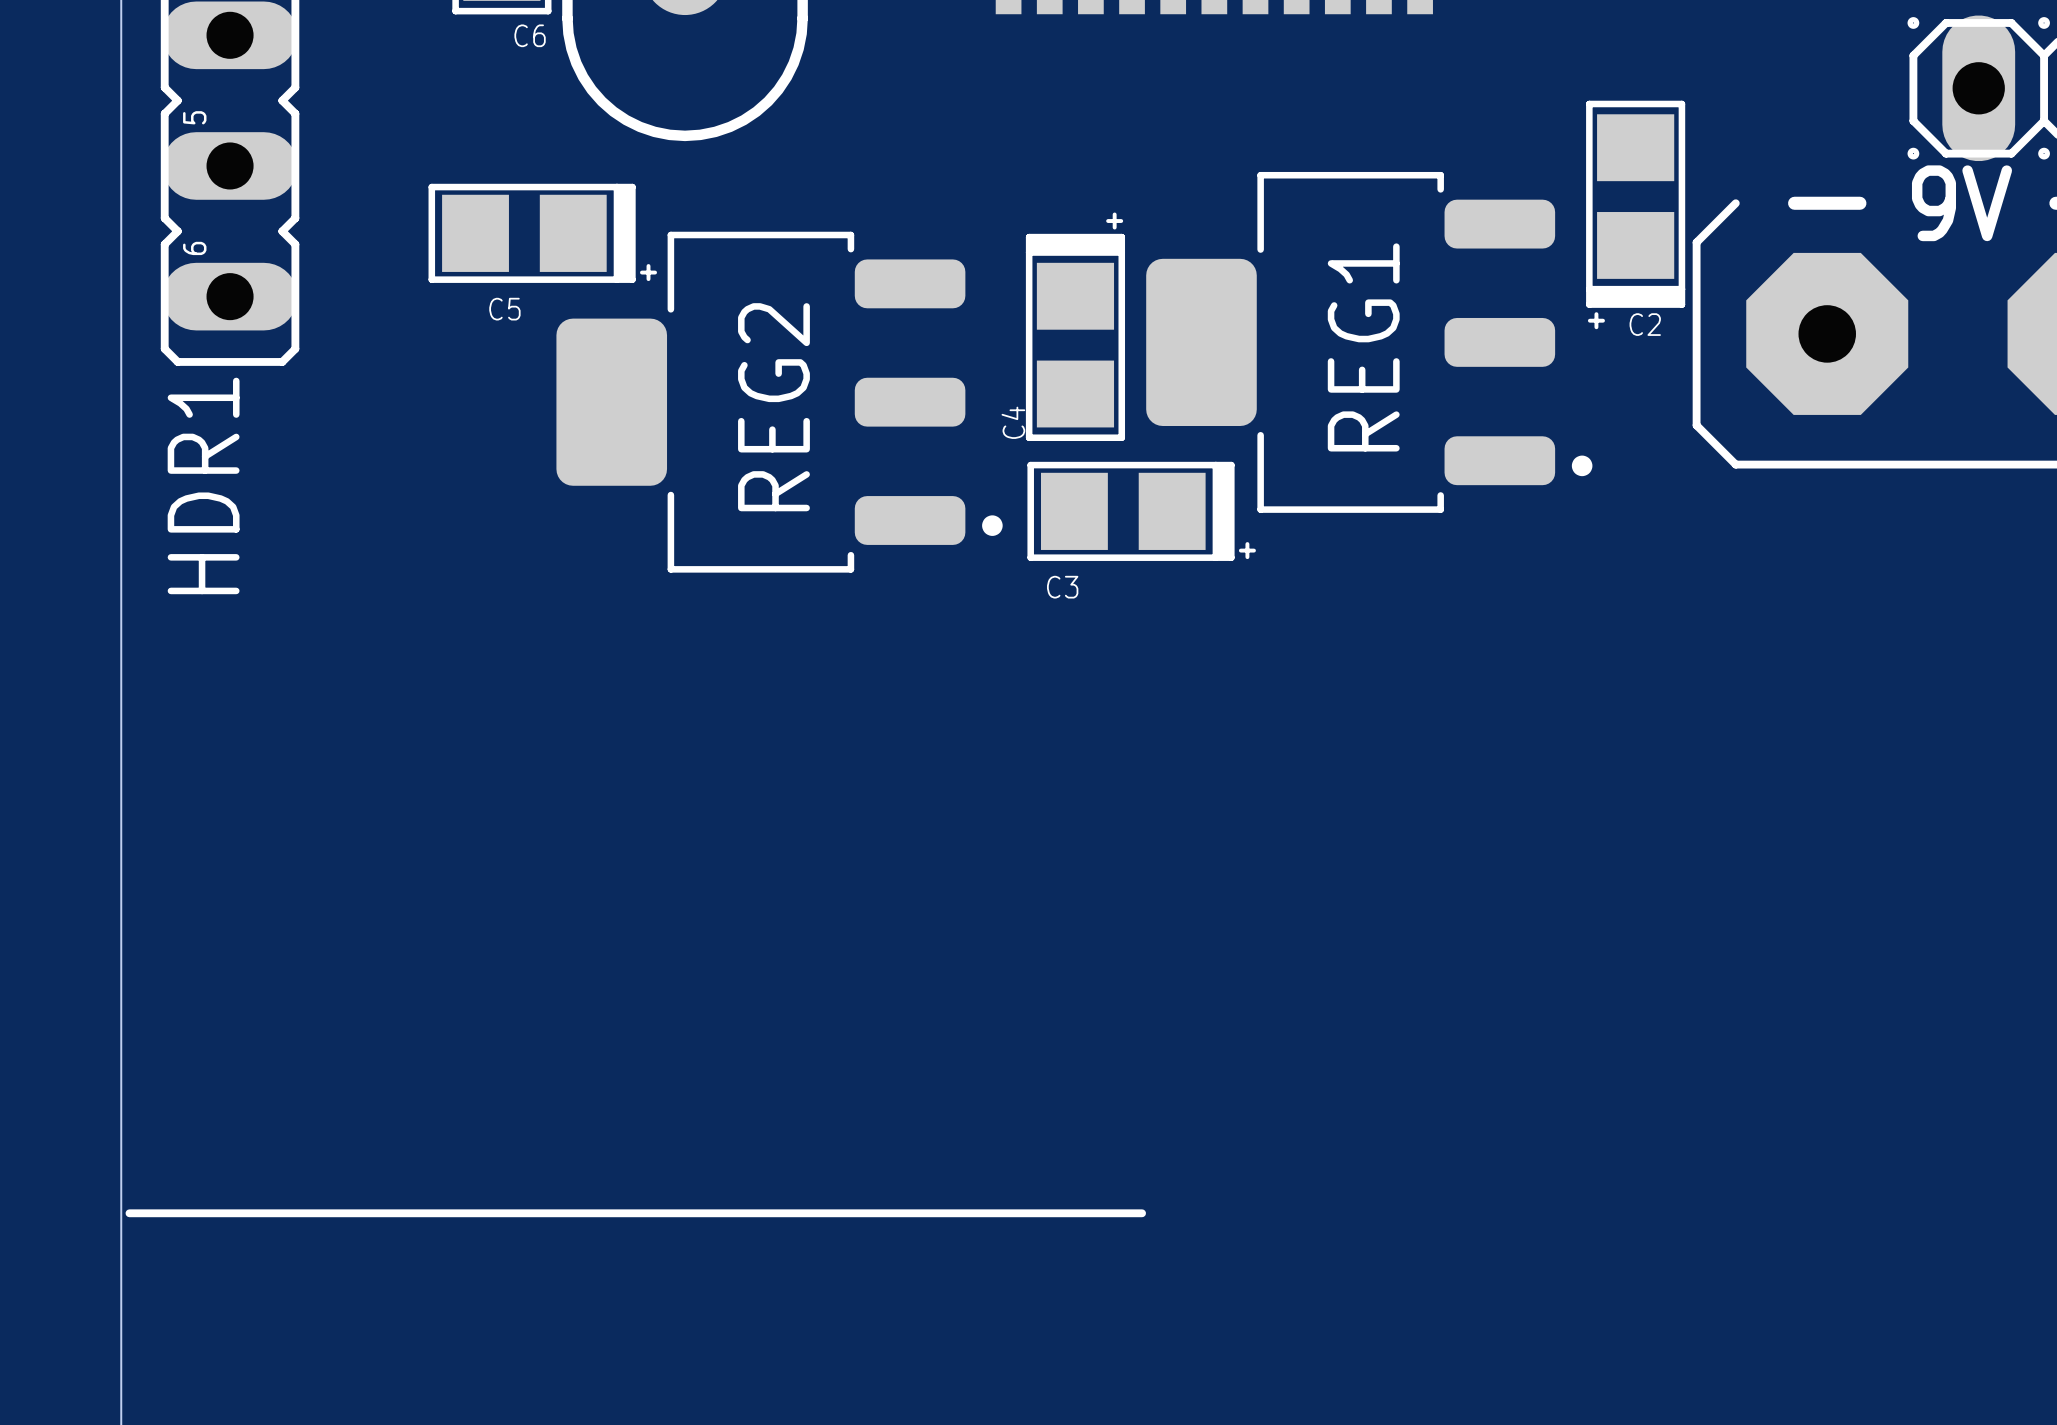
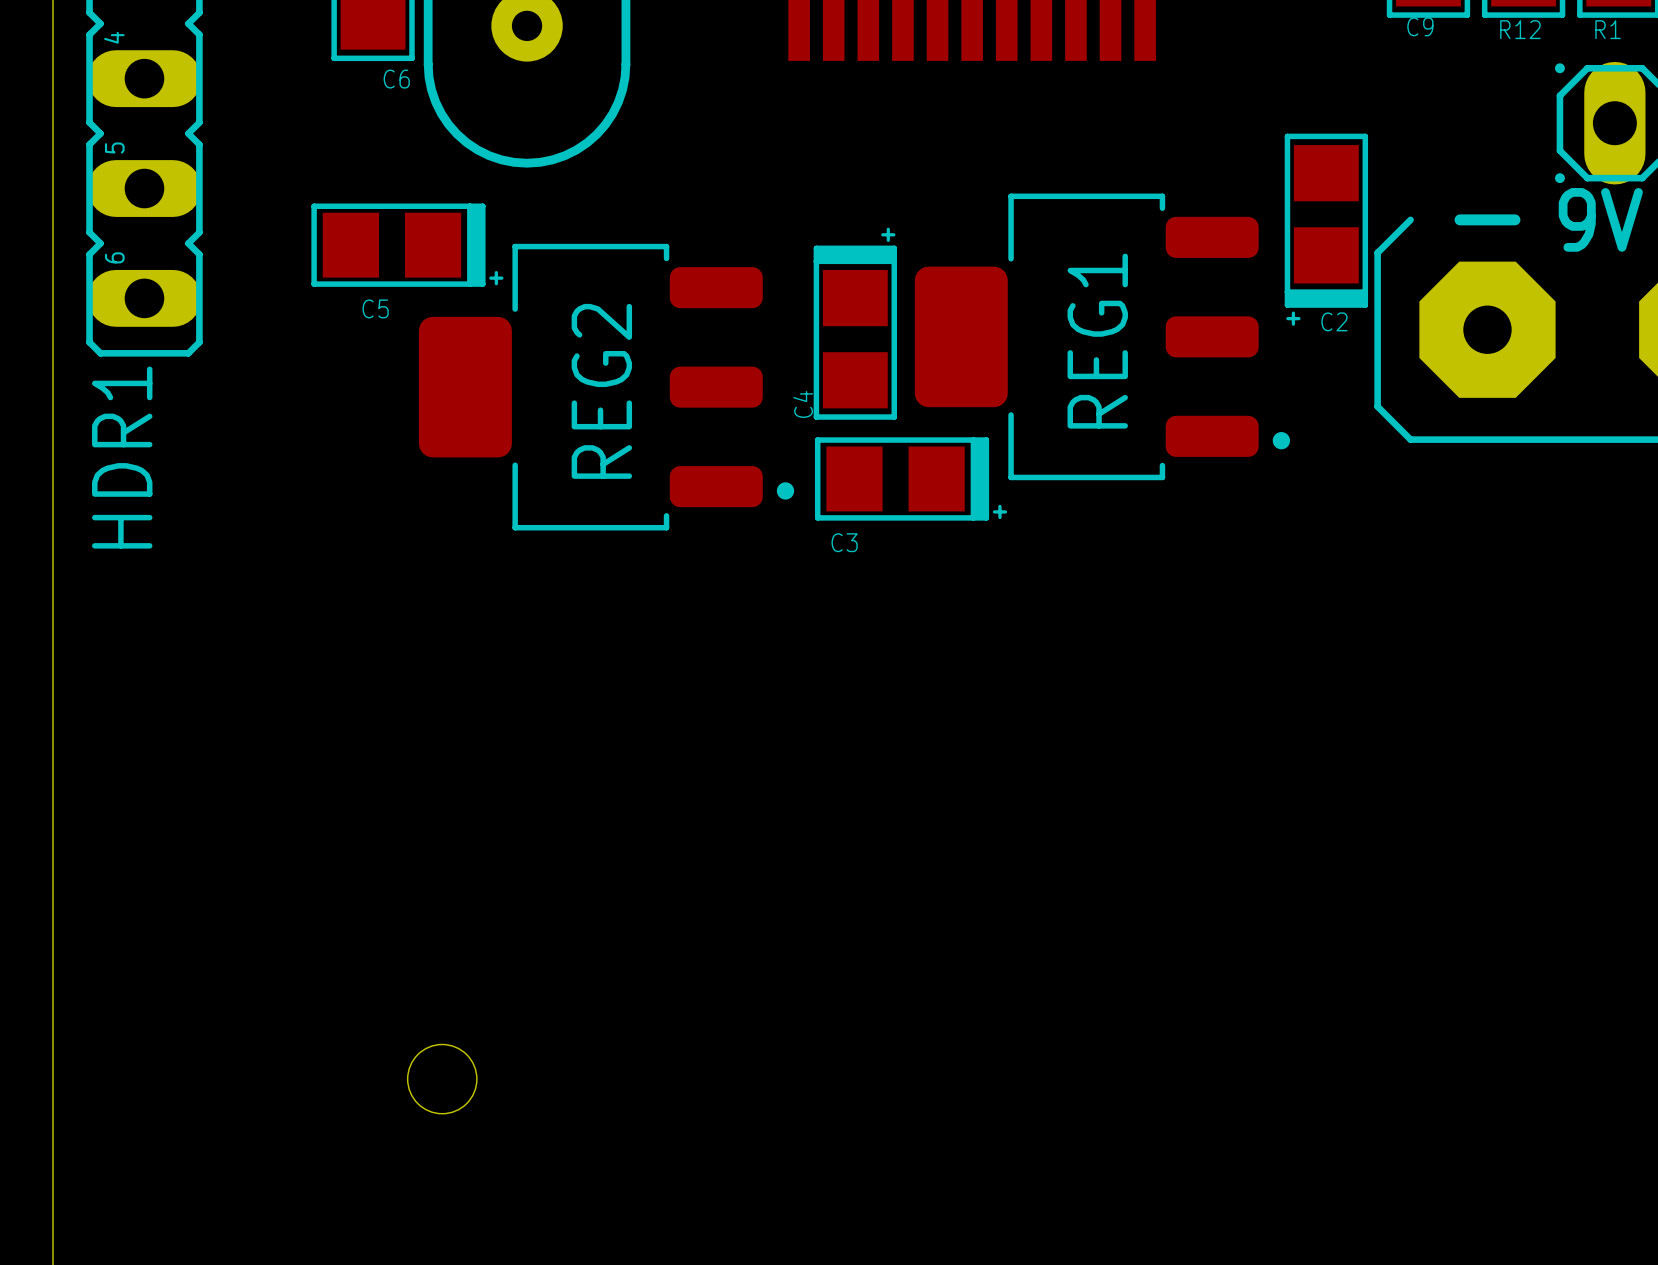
round board edge: none -> [407, 1044, 477, 1114]
line: (129, 1213) (1142, 1213) -> none

